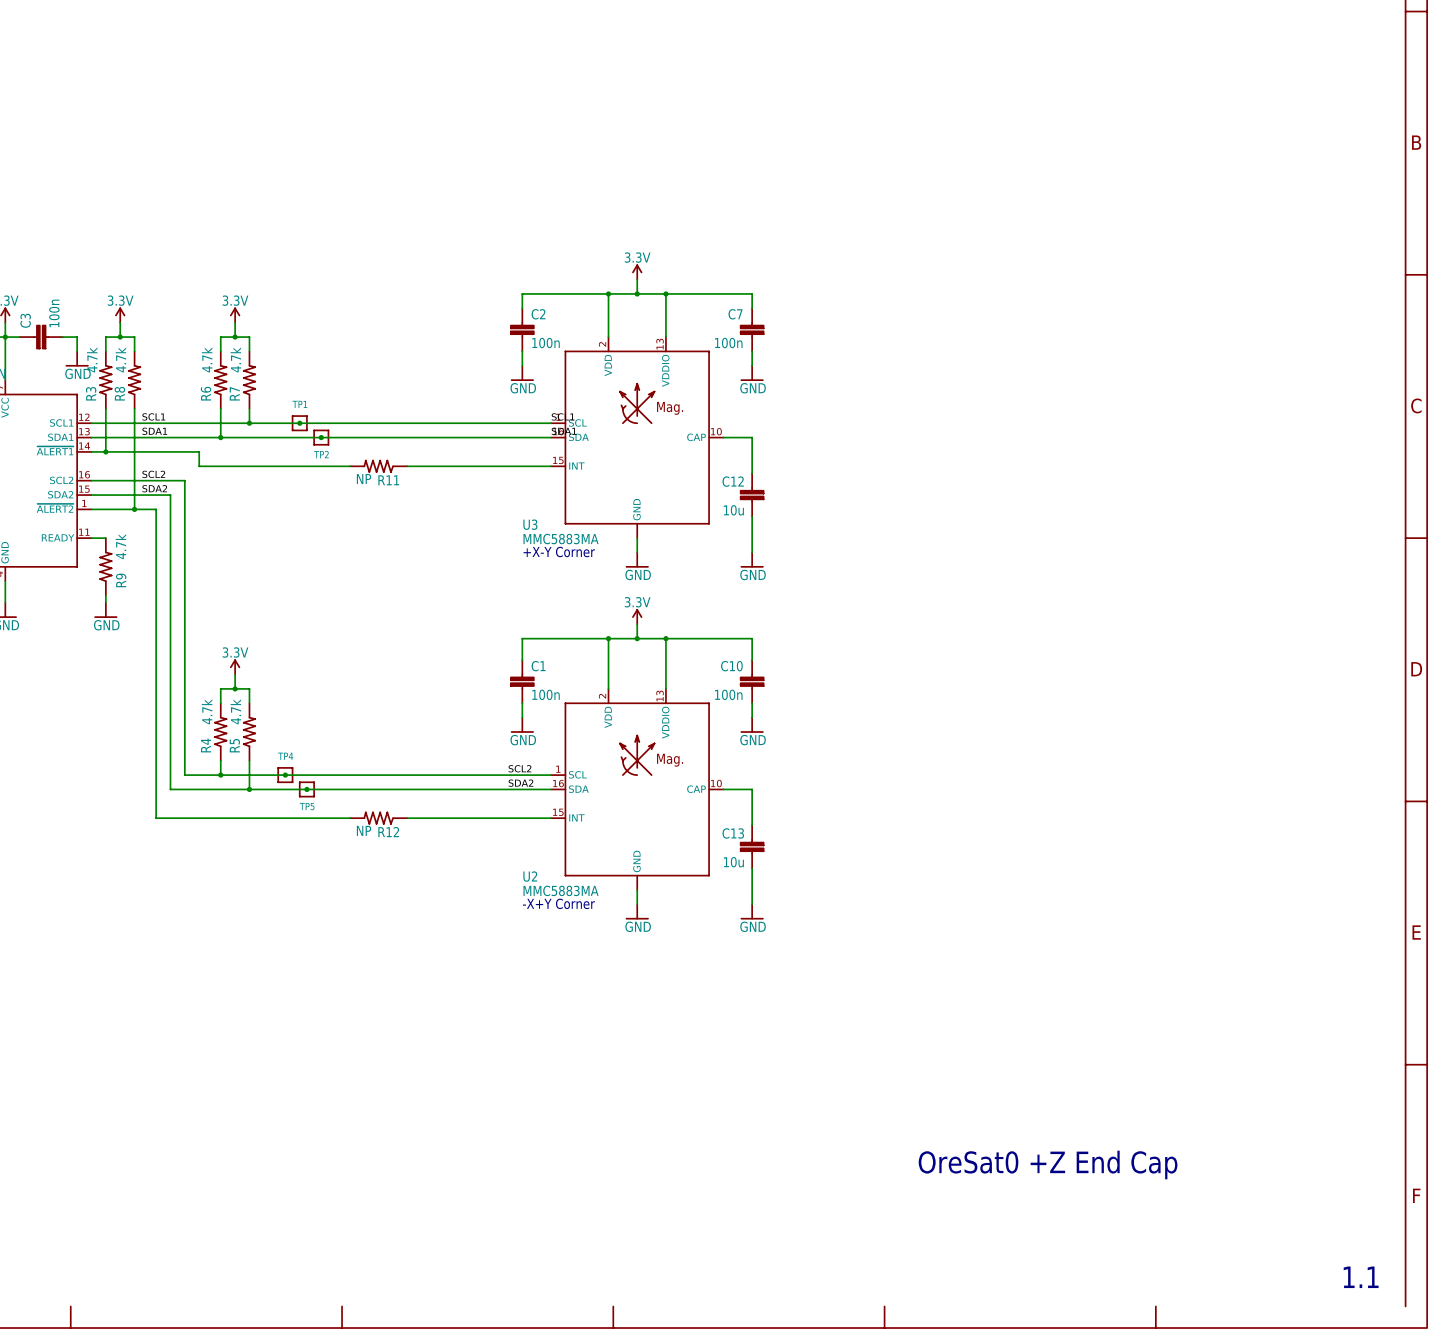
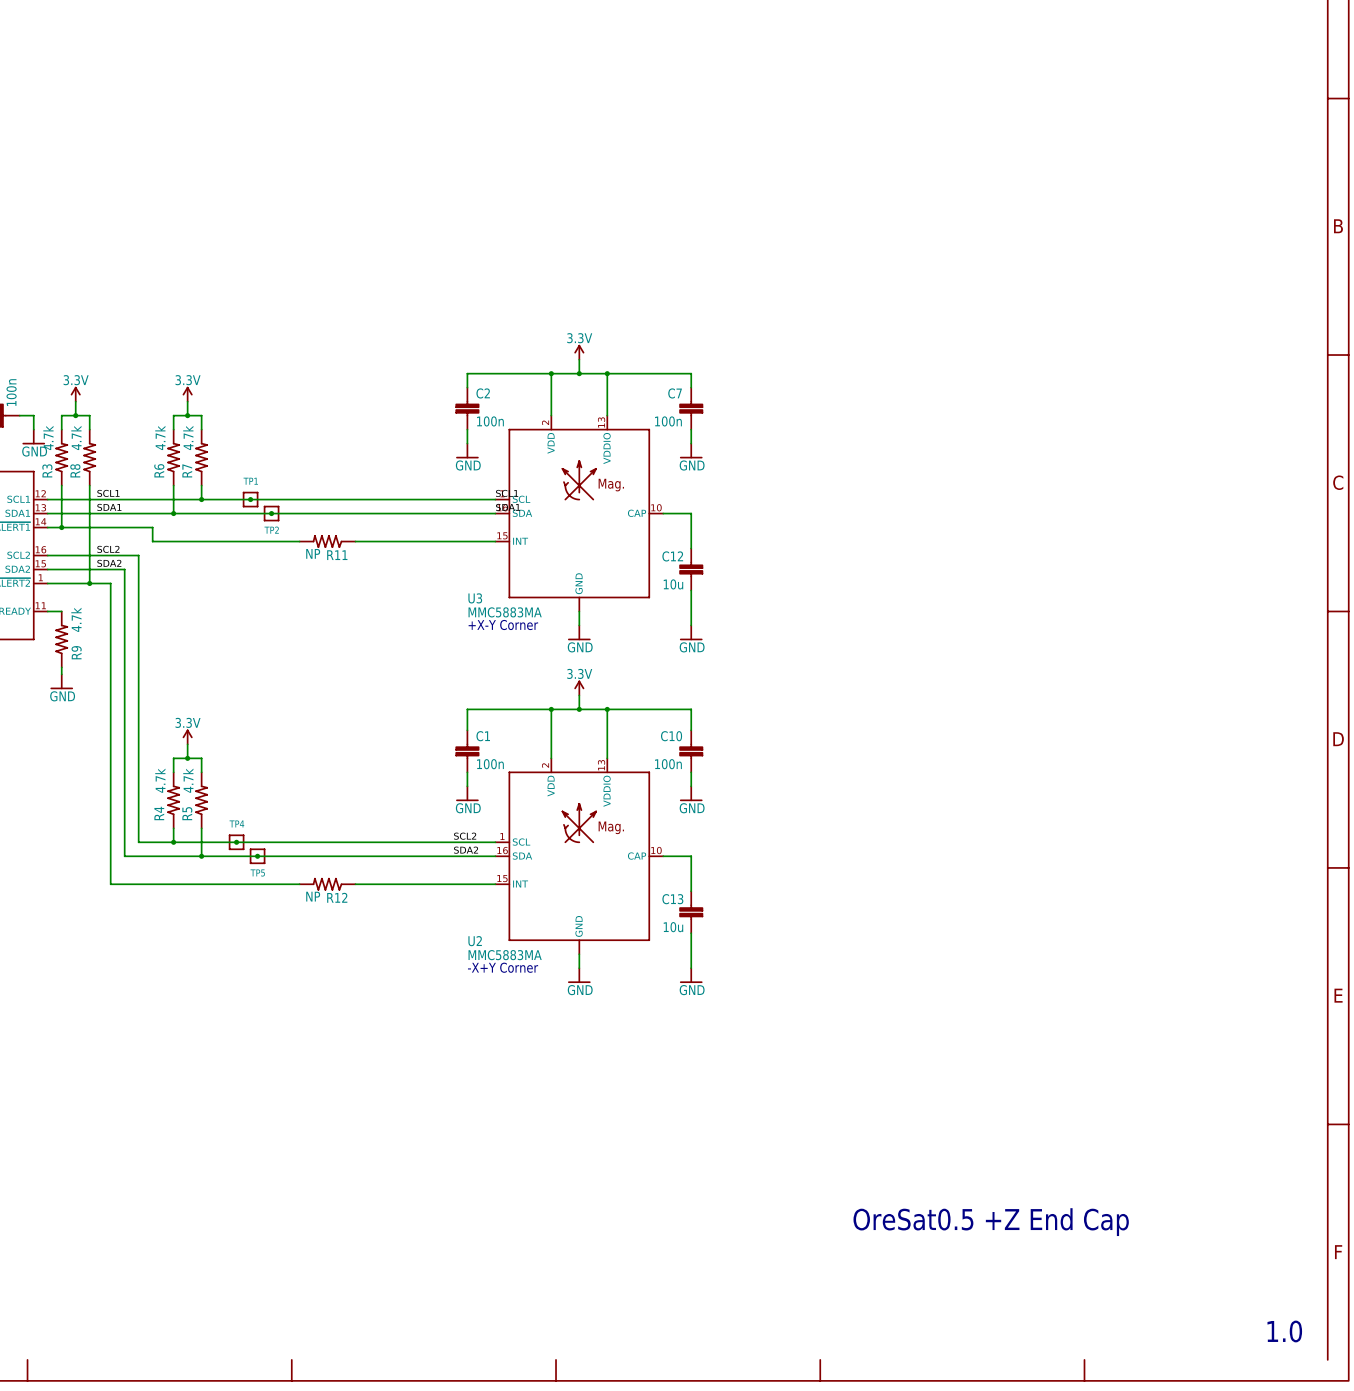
text: OreSat0 +Z End Cap (1048, 1165) -> OreSat0.5 +Z End Cap (991, 1222)
text: 1.1 (1361, 1277) -> 1.0 (1284, 1331)

